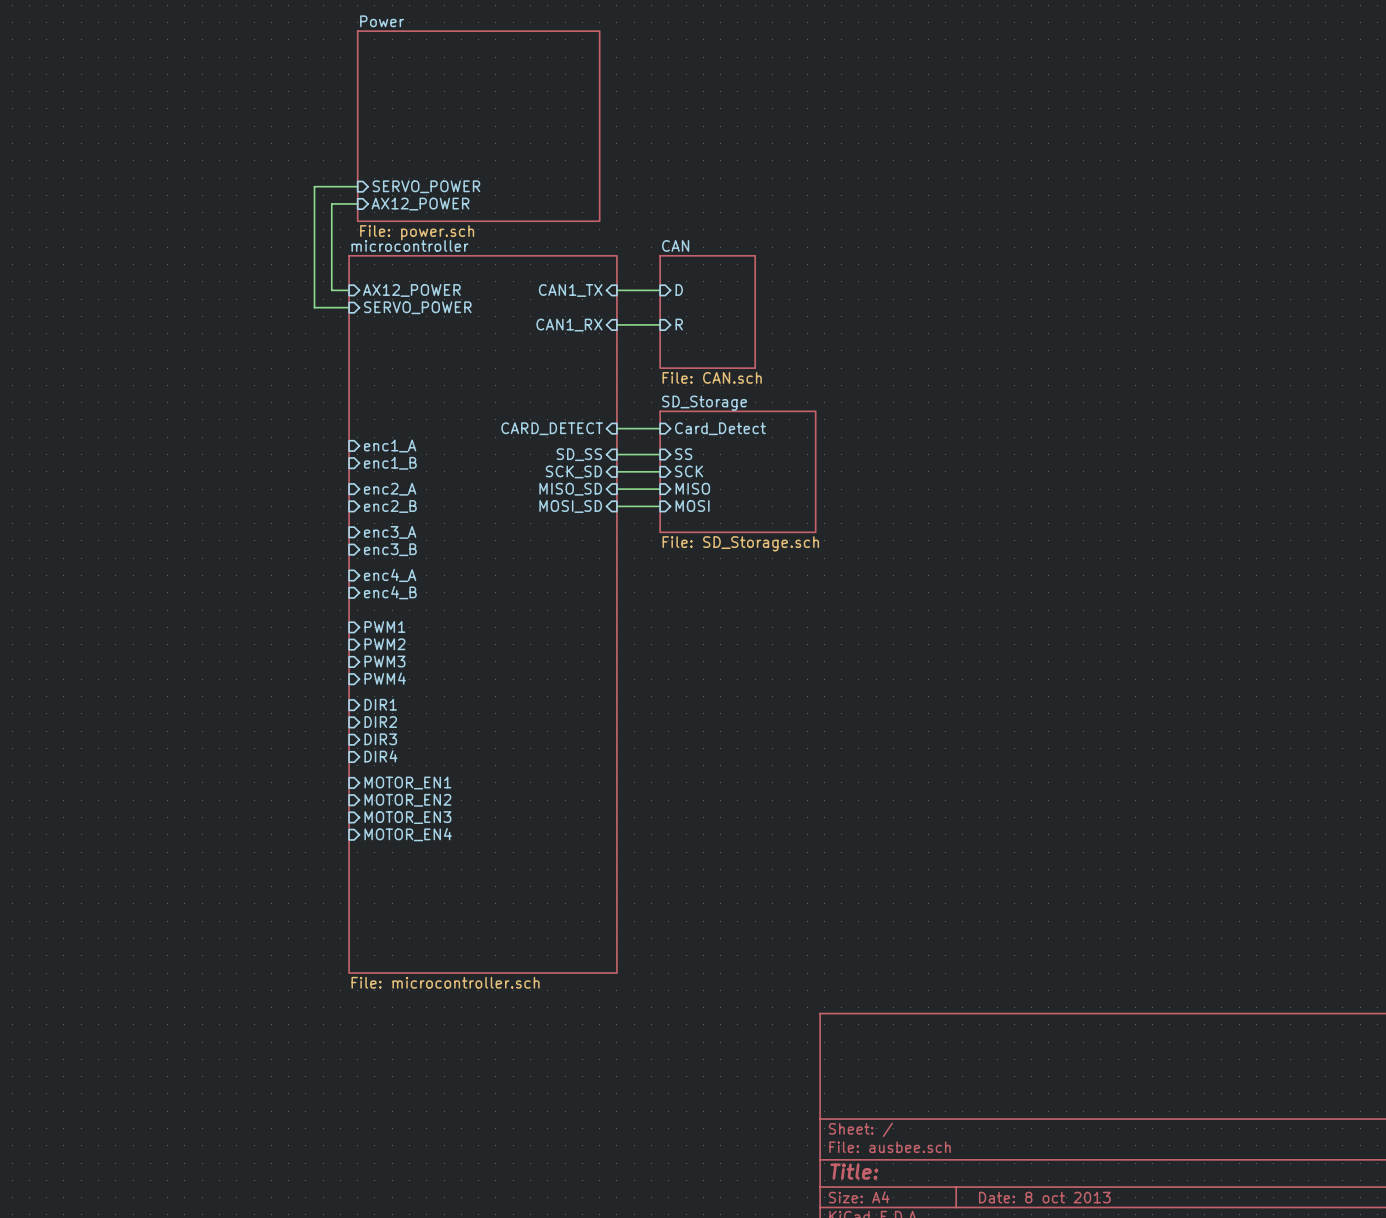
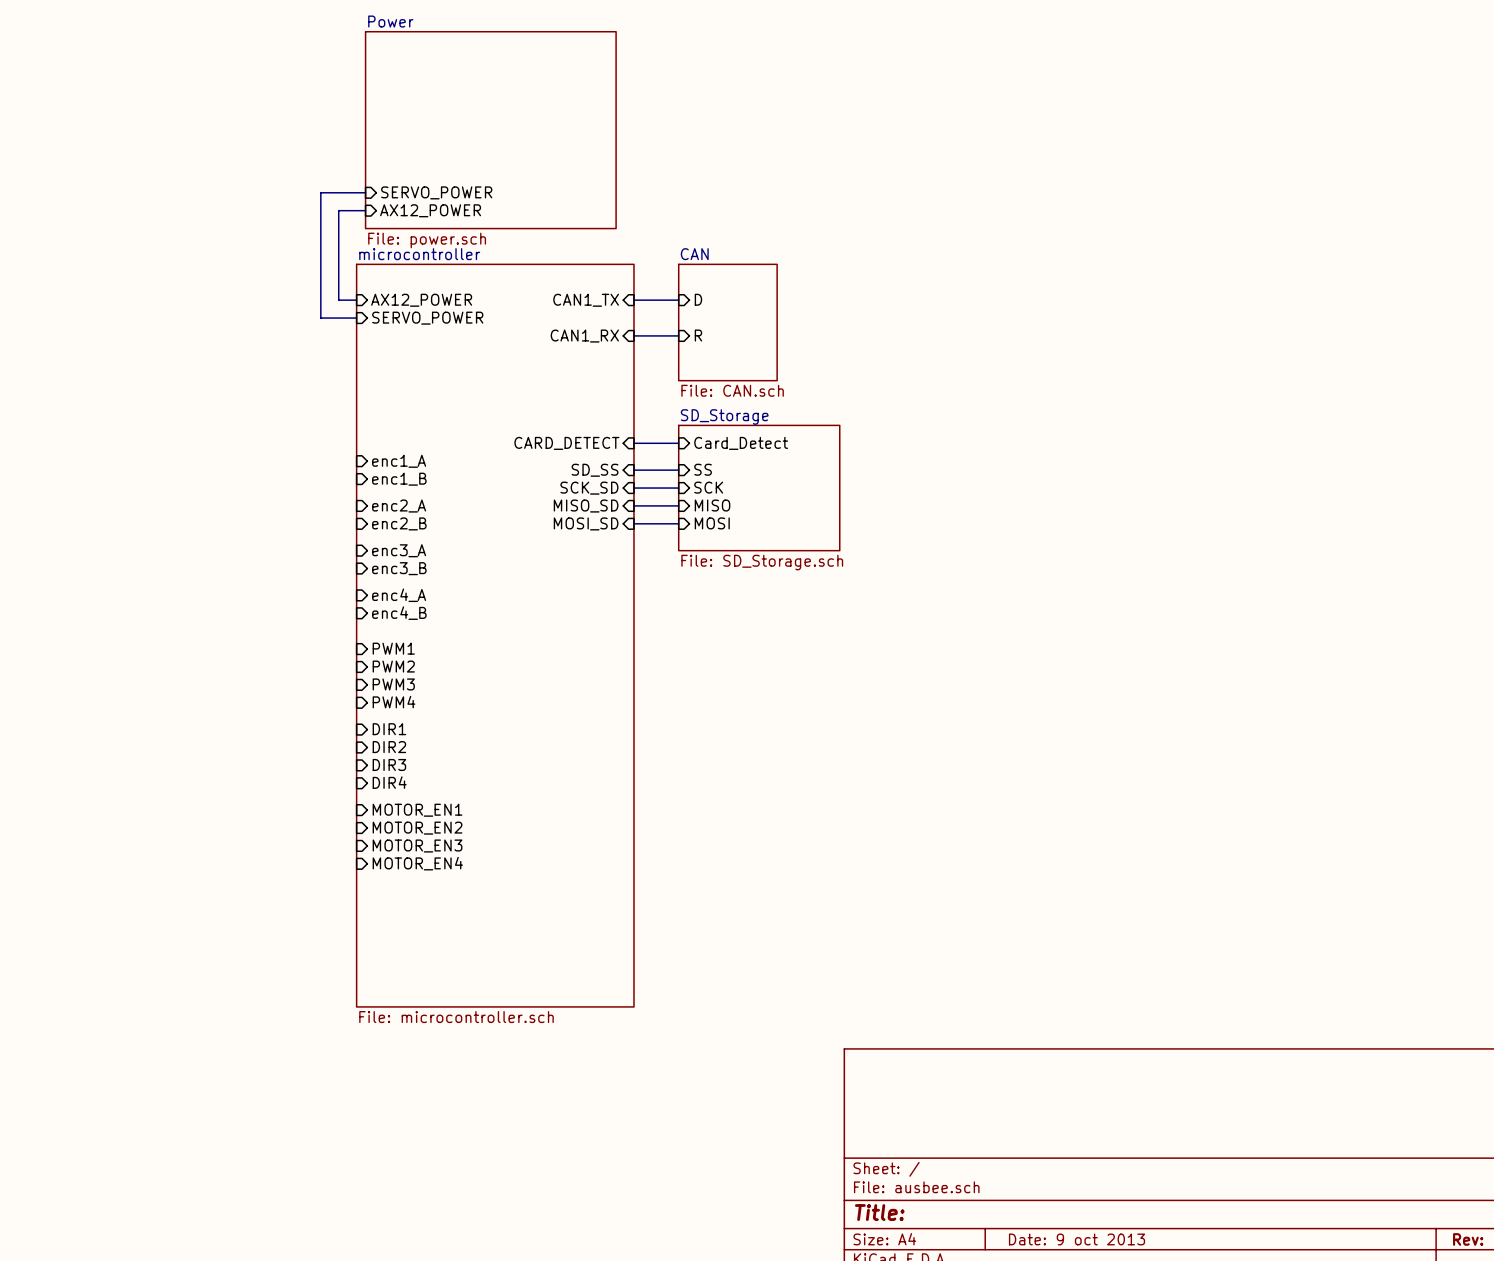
title block: Date: 8 oct 2013 (1044, 1197) -> Date: 9 oct 2013 (1077, 1239)

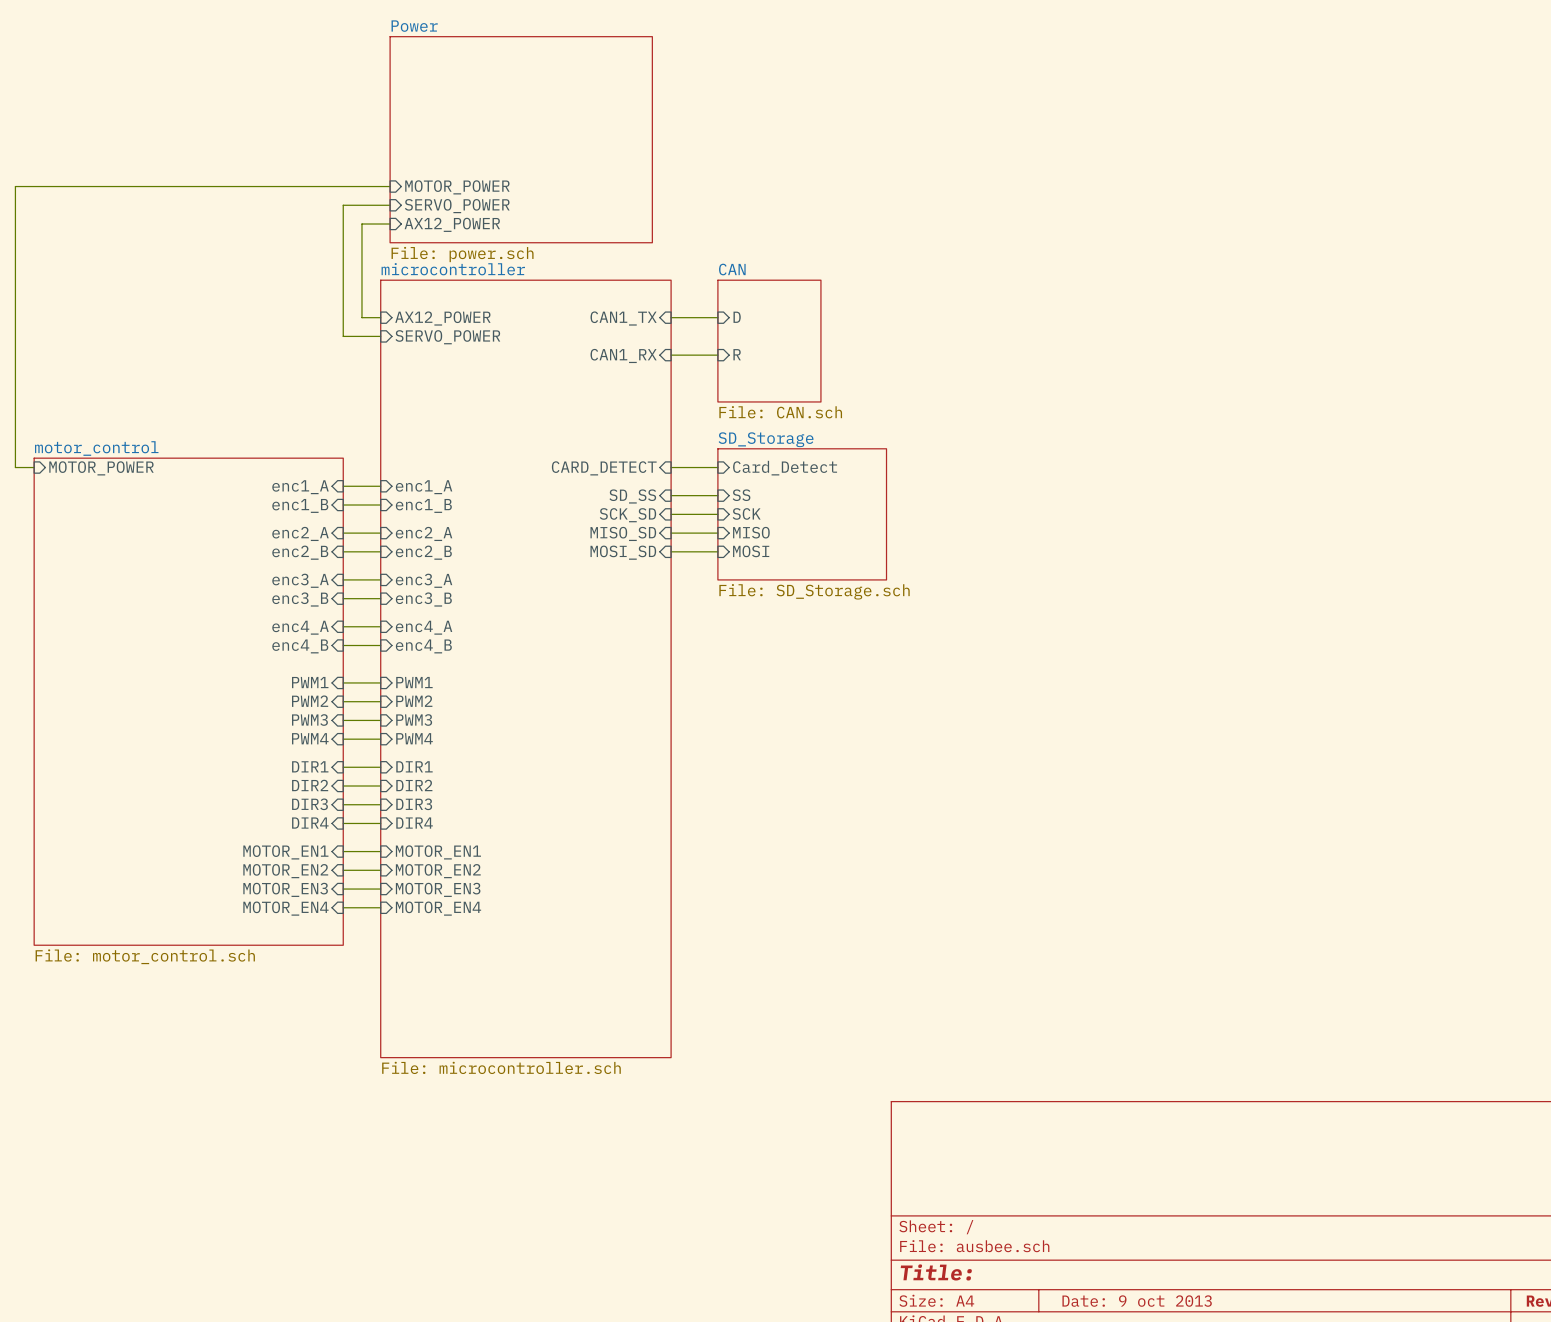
wire: none -> (390, 186) (15, 186) (15, 467) (34, 467)
sheet pin: none -> MOTOR_POWER (457, 187)
sheet pin: none -> MOTOR_POWER (101, 468)
sheet pin: none -> enc1_A (300, 487)
wire: none -> (343, 486) (380, 486)
sheet pin: none -> enc1_B (300, 505)
wire: none -> (343, 505) (380, 505)
wire: none -> (343, 533) (380, 533)
sheet pin: none -> enc2_A (300, 533)
sheet pin: none -> enc2_B (300, 552)
wire: none -> (343, 551) (380, 551)
sheet pin: none -> enc3_A (300, 580)
wire: none -> (343, 579) (380, 579)
sheet pin: none -> enc3_B (300, 599)
wire: none -> (343, 598) (380, 598)
sheet pin: none -> enc4_A (300, 627)
wire: none -> (343, 626) (380, 626)
sheet pin: none -> enc4_B (300, 646)
wire: none -> (343, 645) (380, 645)
sheet pin: none -> PWM1 (310, 682)
wire: none -> (343, 682) (380, 682)
sheet motor_control: none -> File: motor_control.sch (188, 701)
sheet pin: none -> PWM2 (310, 701)
wire: none -> (343, 701) (380, 701)
sheet pin: none -> PWM3 (309, 720)
wire: none -> (343, 720) (380, 720)
sheet pin: none -> PWM4 (310, 738)
wire: none -> (343, 739) (380, 739)
sheet pin: none -> DIR1 (310, 766)
wire: none -> (343, 767) (380, 767)
sheet pin: none -> DIR2 (310, 785)
wire: none -> (343, 786) (380, 786)
sheet pin: none -> DIR3 (309, 804)
wire: none -> (343, 804) (380, 804)
sheet pin: none -> DIR4 (310, 823)
wire: none -> (343, 823) (380, 823)
sheet pin: none -> MOTOR_EN1 (285, 852)
wire: none -> (343, 851) (380, 851)
sheet pin: none -> MOTOR_EN2 (285, 871)
wire: none -> (343, 870) (380, 870)
wire: none -> (343, 889) (380, 889)
sheet pin: none -> MOTOR_EN3 (285, 889)
sheet pin: none -> MOTOR_EN4 (285, 908)
wire: none -> (343, 907) (380, 907)

